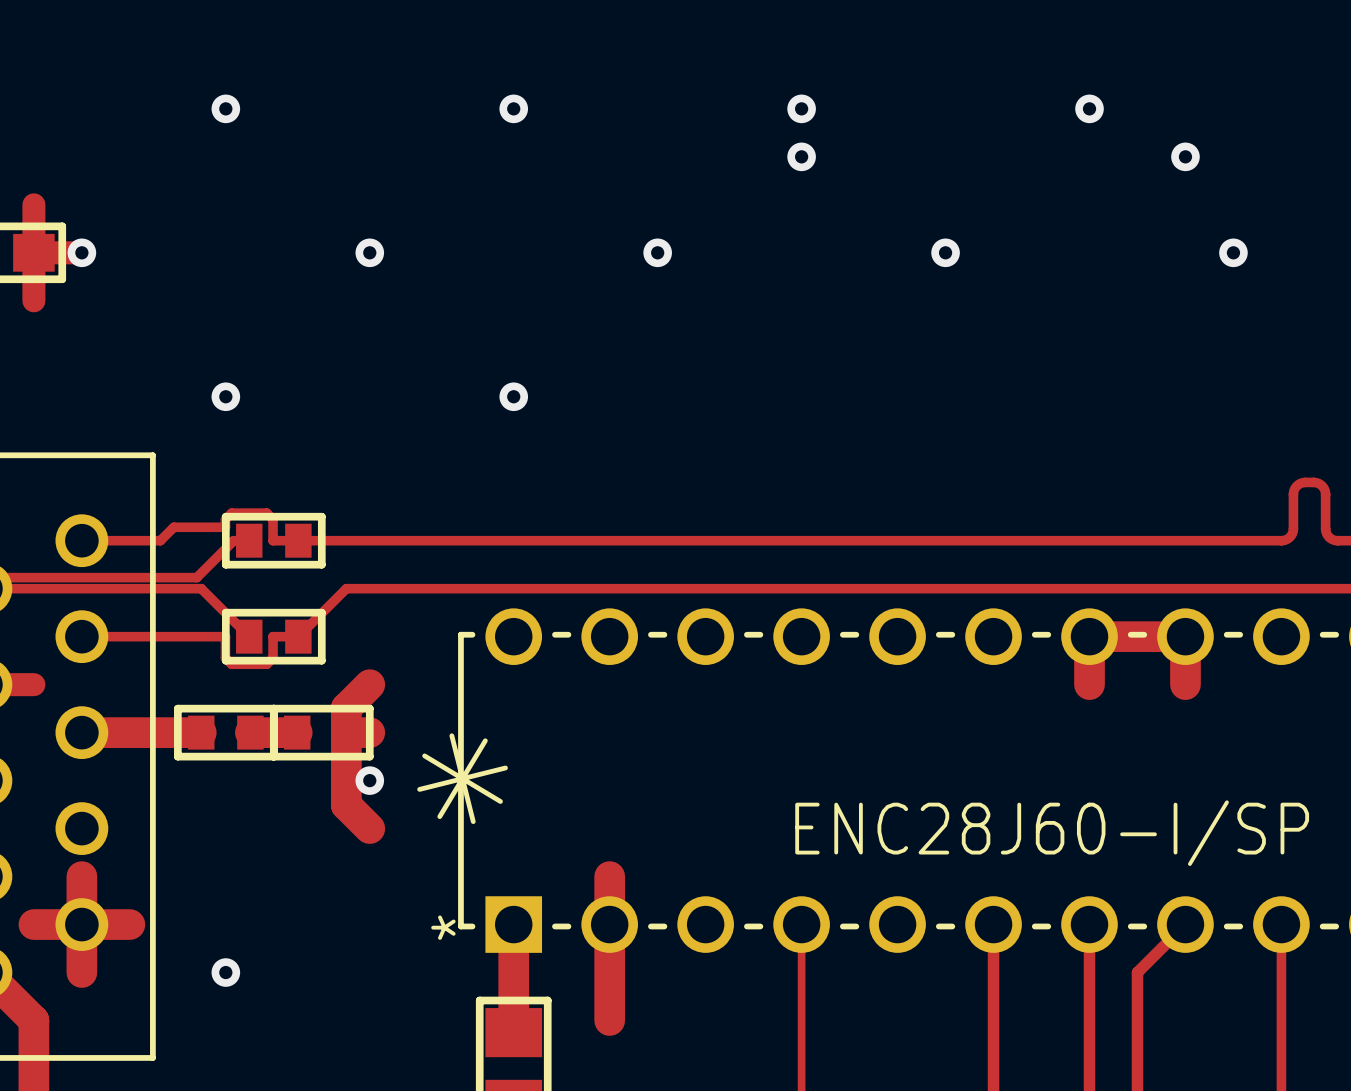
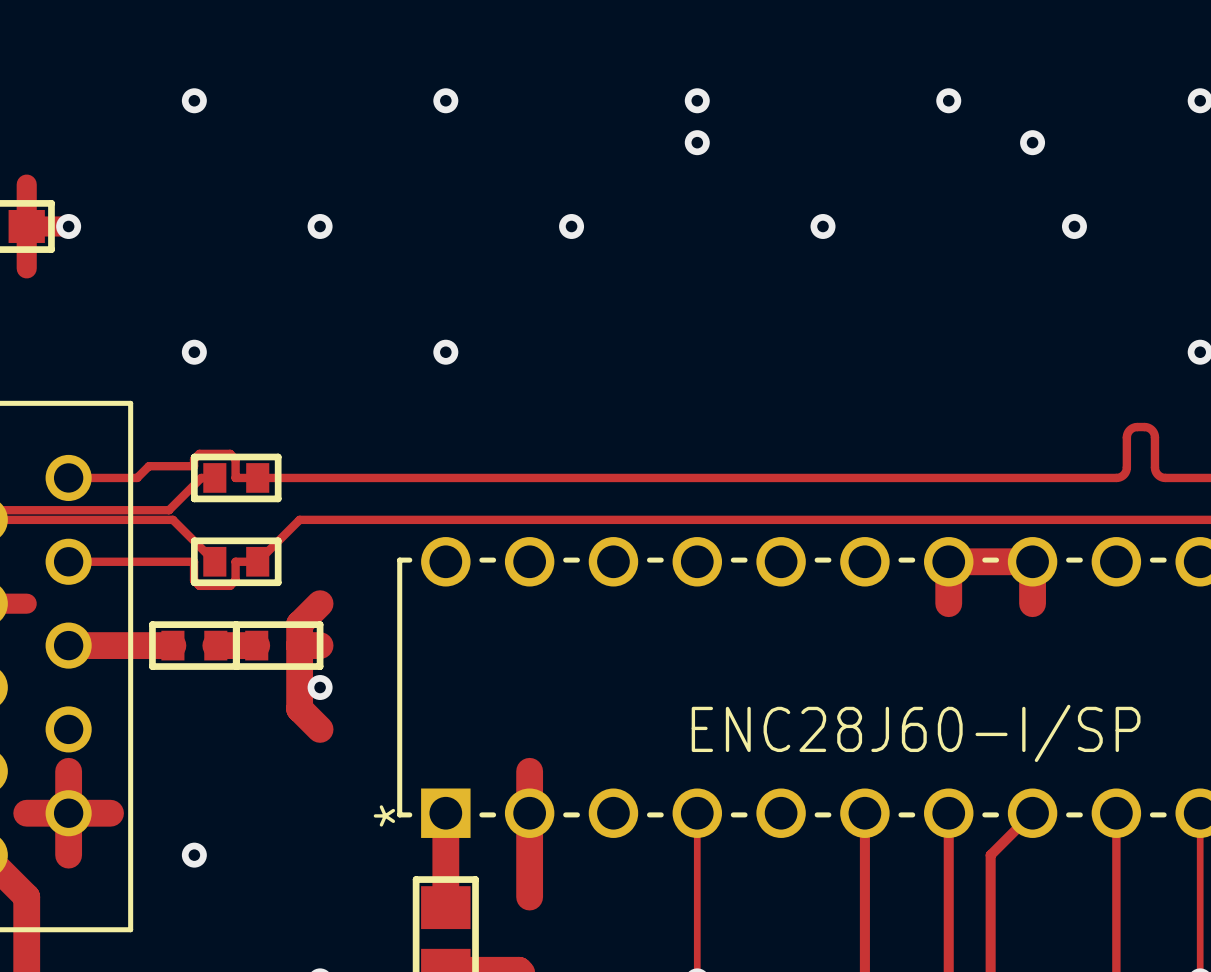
drawing: [417, 733, 508, 825] -> none

